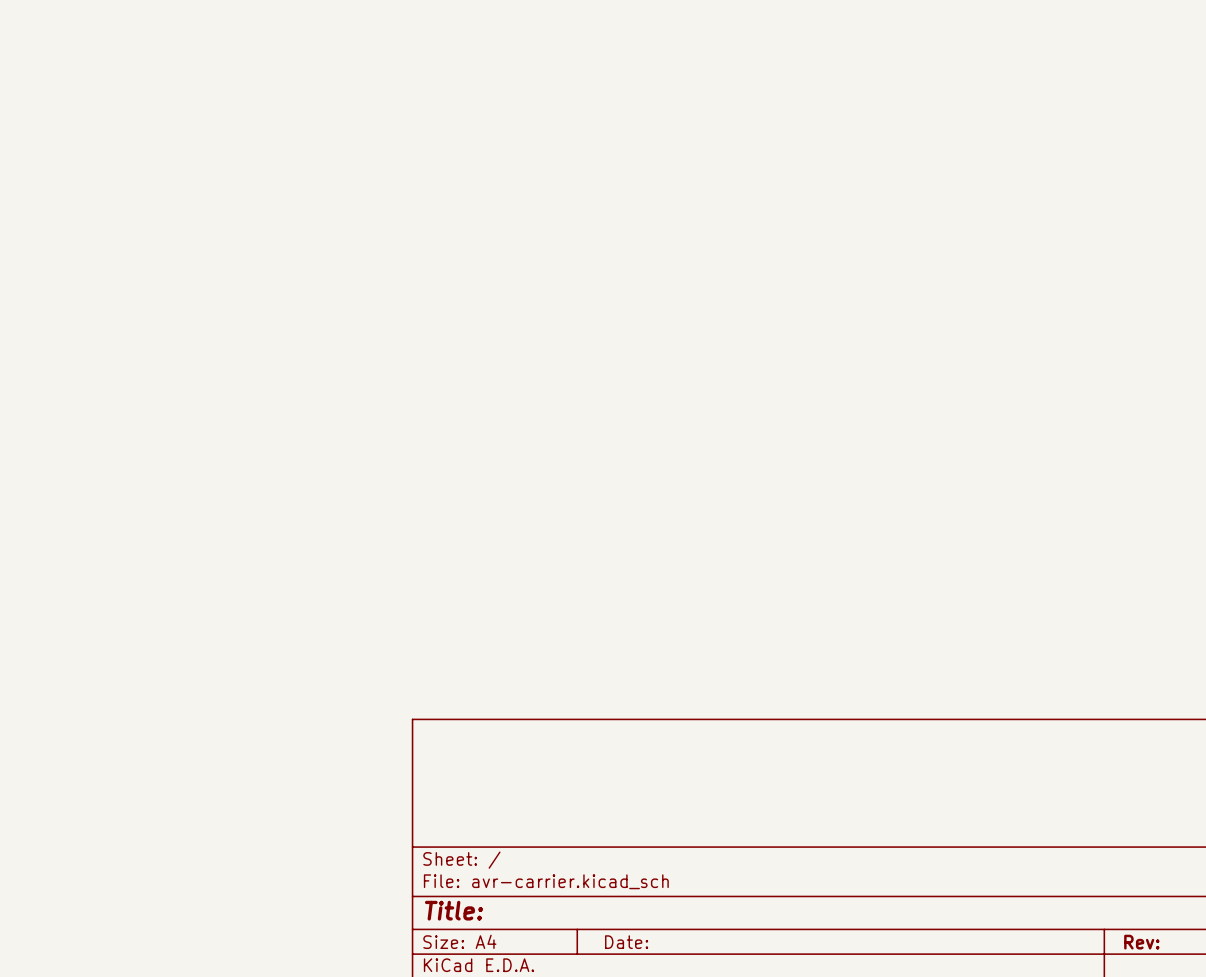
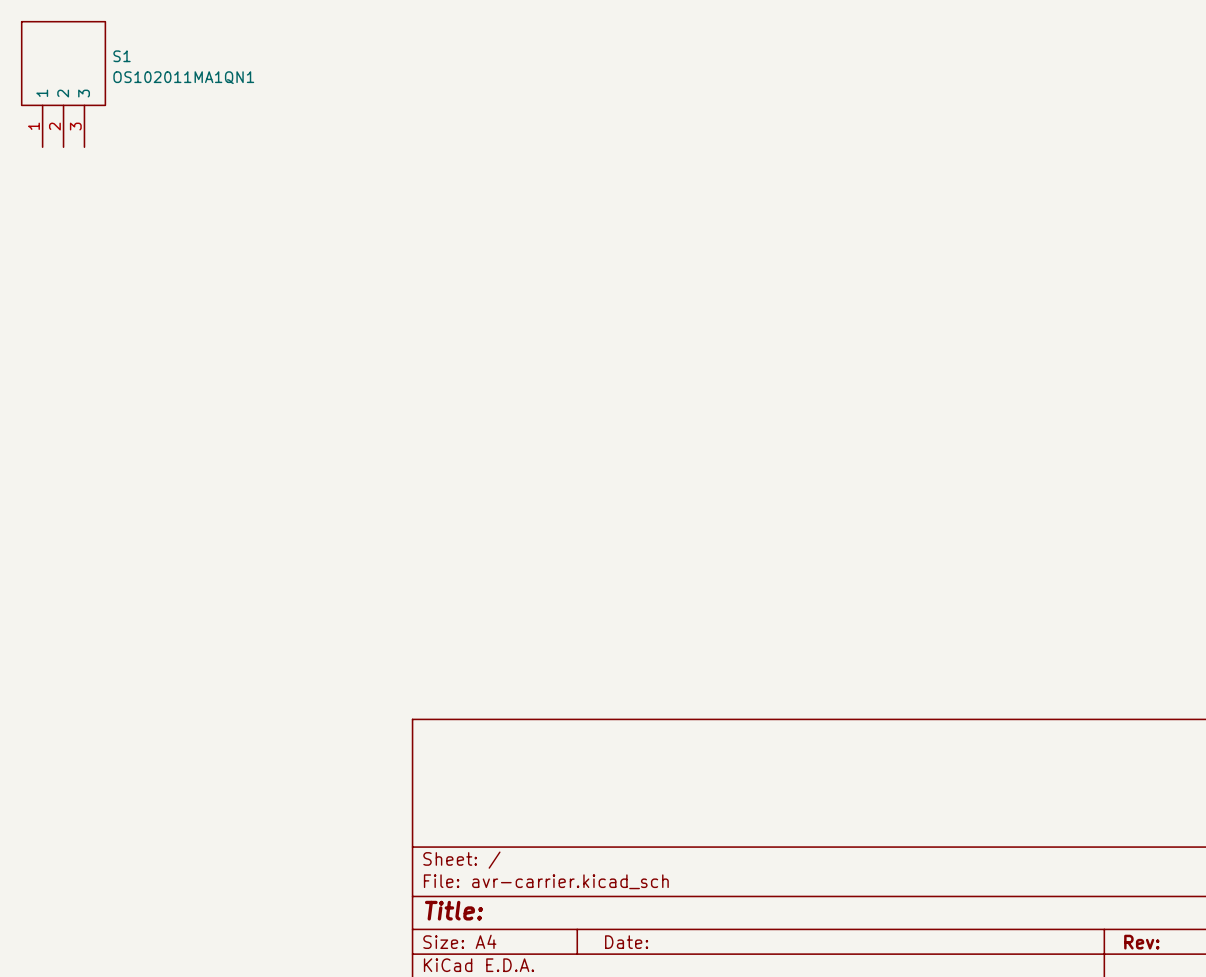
S1: none -> OS102011MA1QN1 (63, 84)

